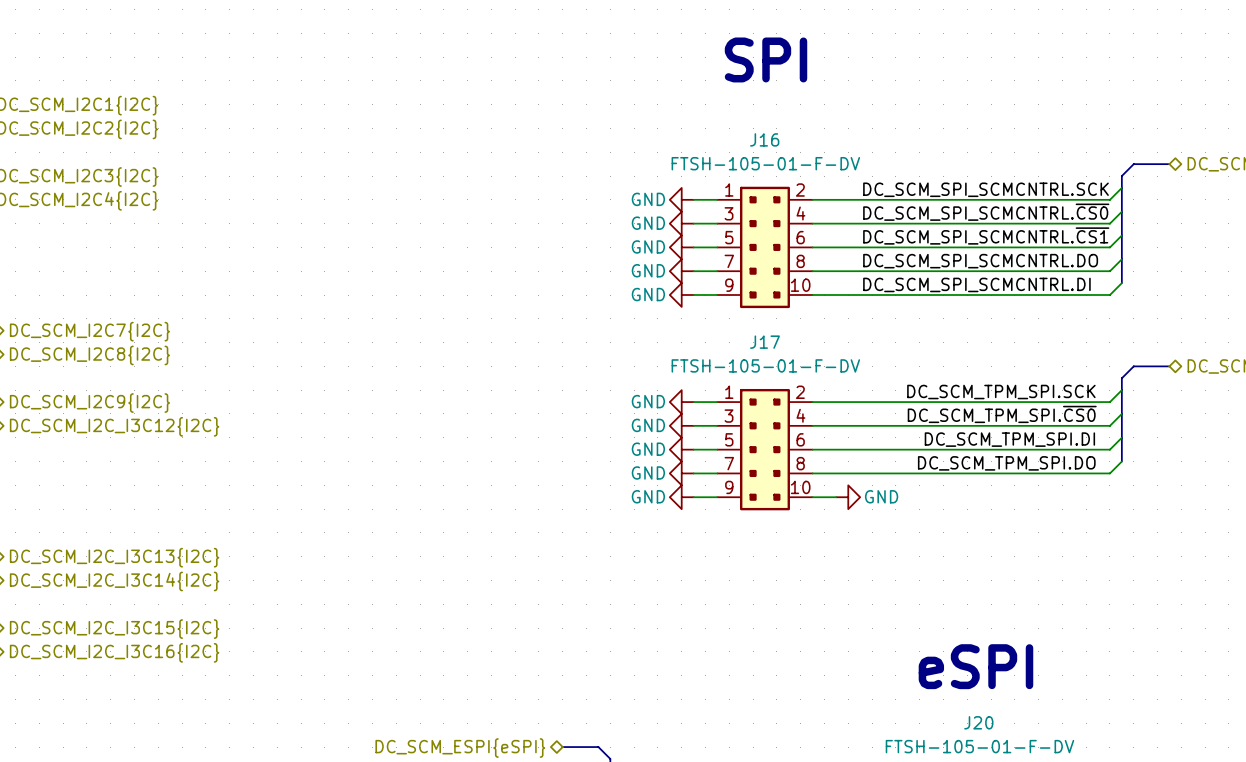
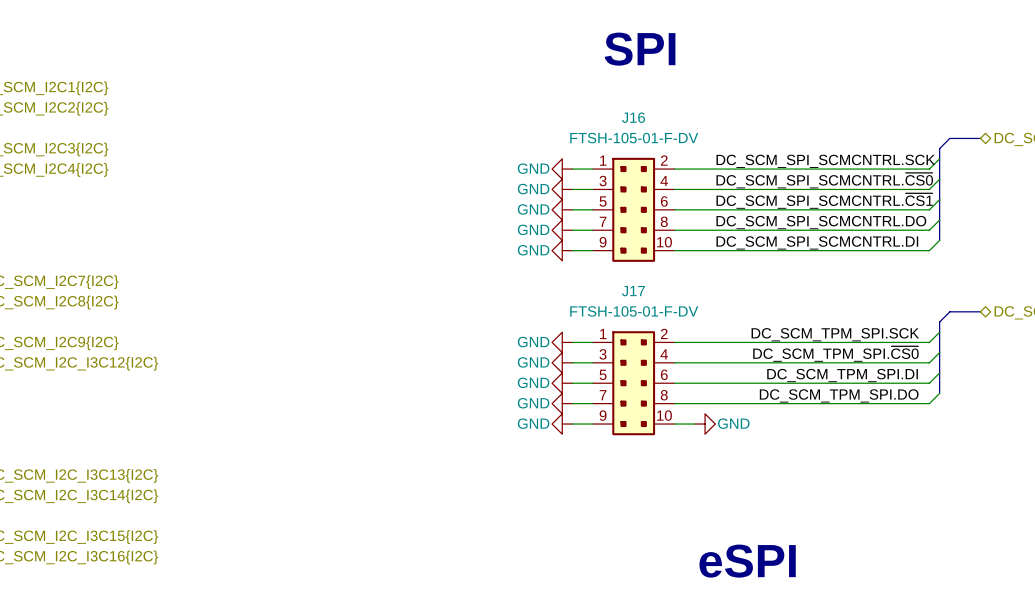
text position: eSPI (975, 666) -> eSPI (747, 561)

